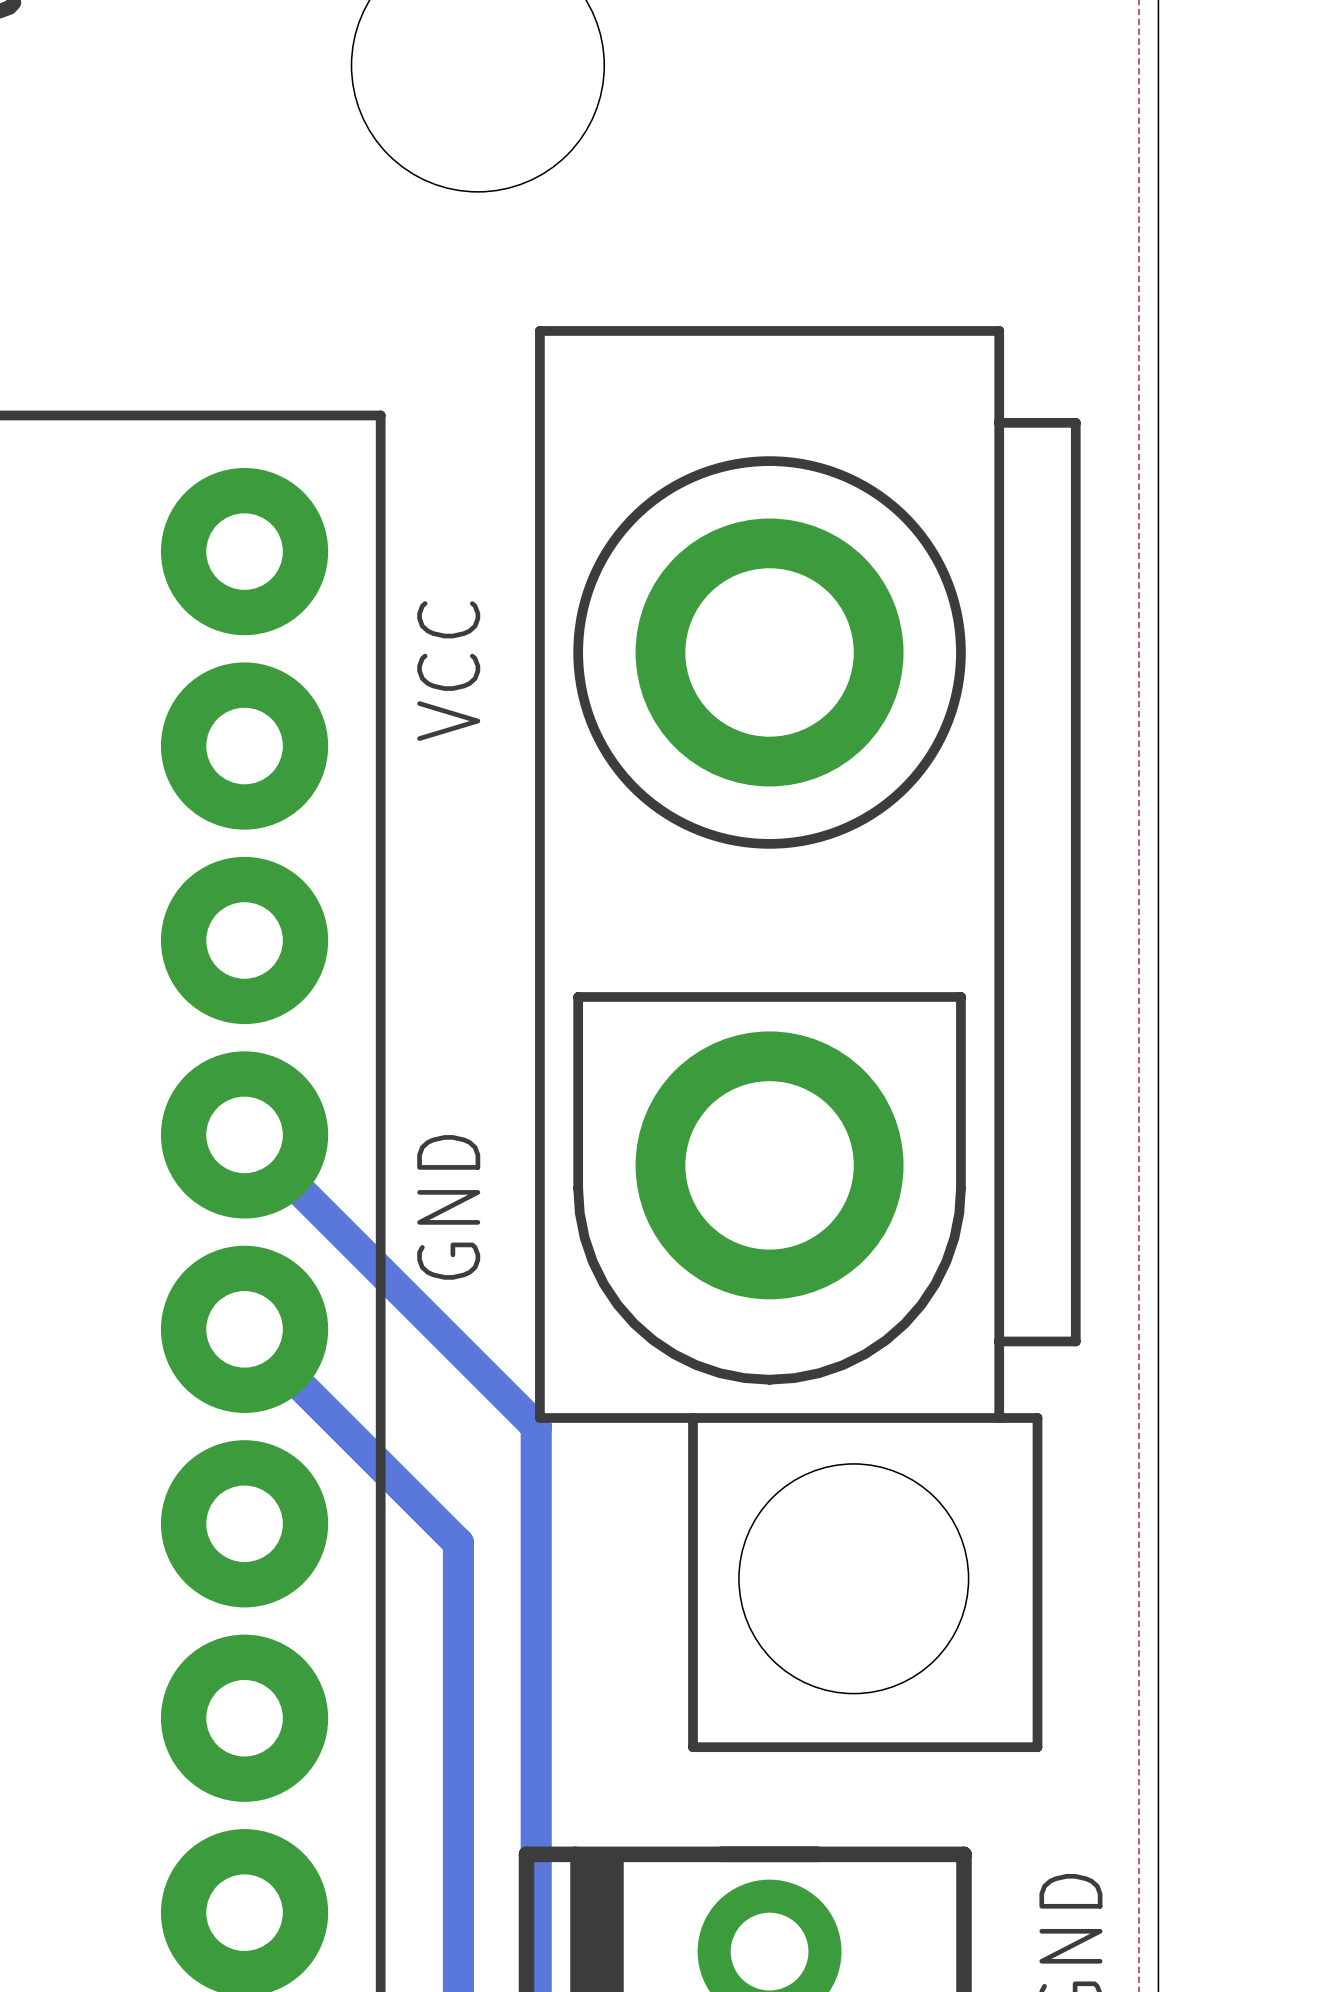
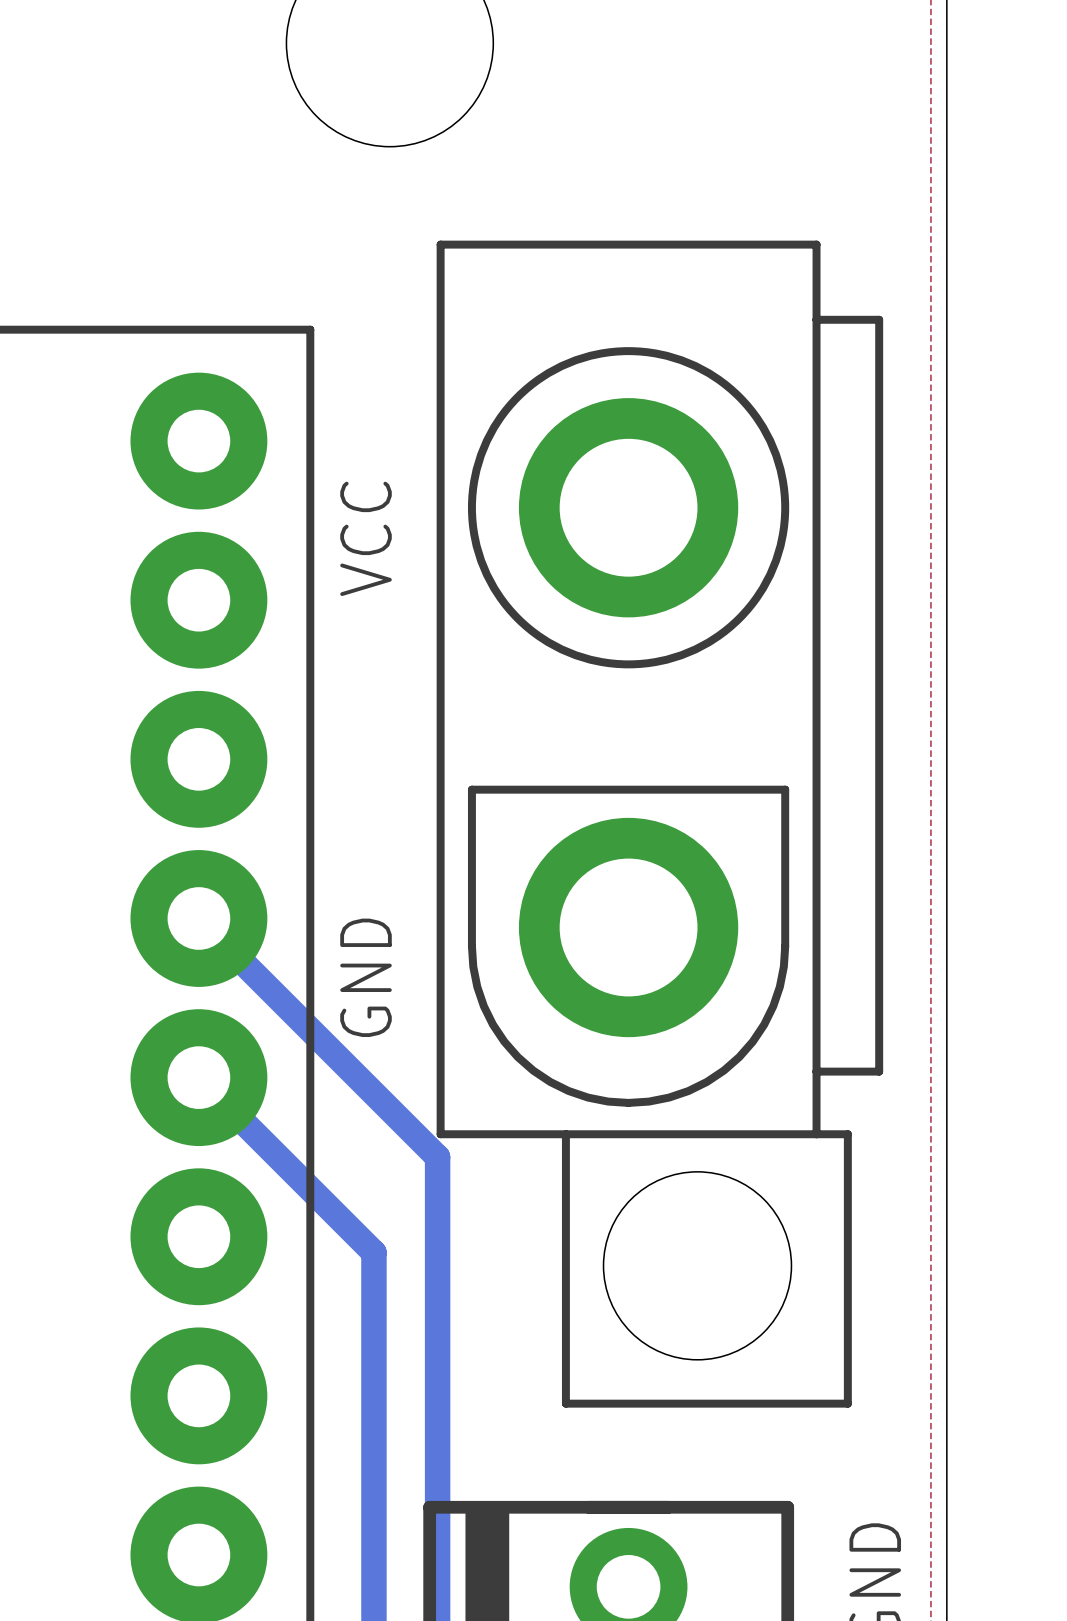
part position: (807, 1039) -> (659, 824)

